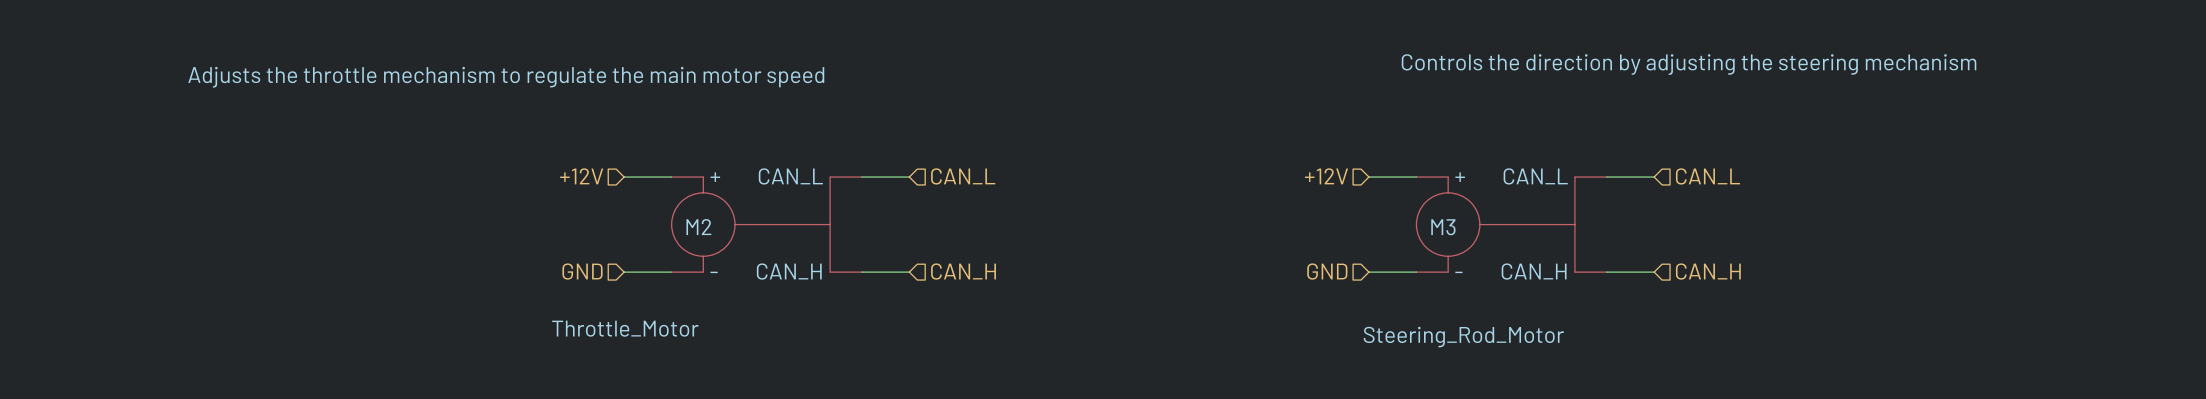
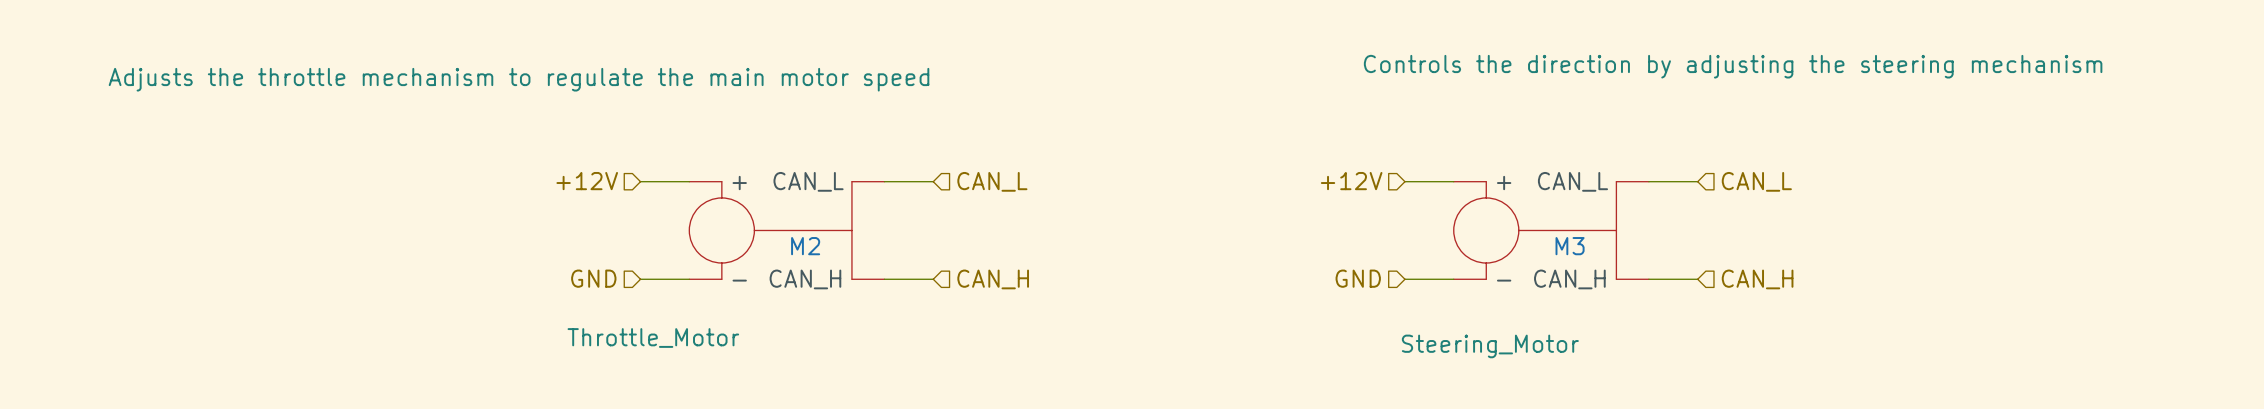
M2 name position: M2 (698, 227) -> M2 (805, 246)
M3 name position: M3 (1443, 227) -> M3 (1570, 246)
M3 value: Steering_Rod_Motor (1463, 337) -> Steering_Motor (1490, 346)

